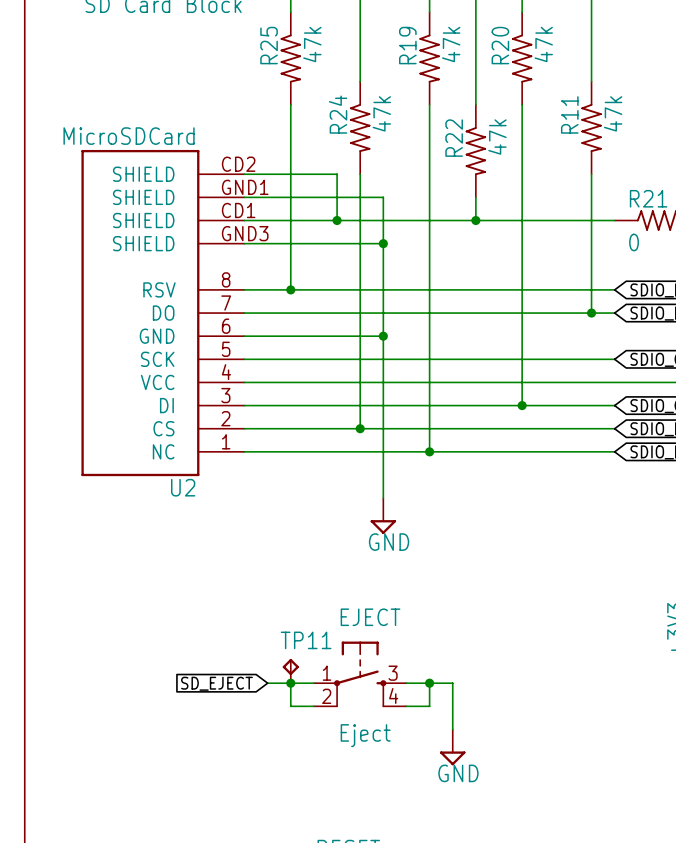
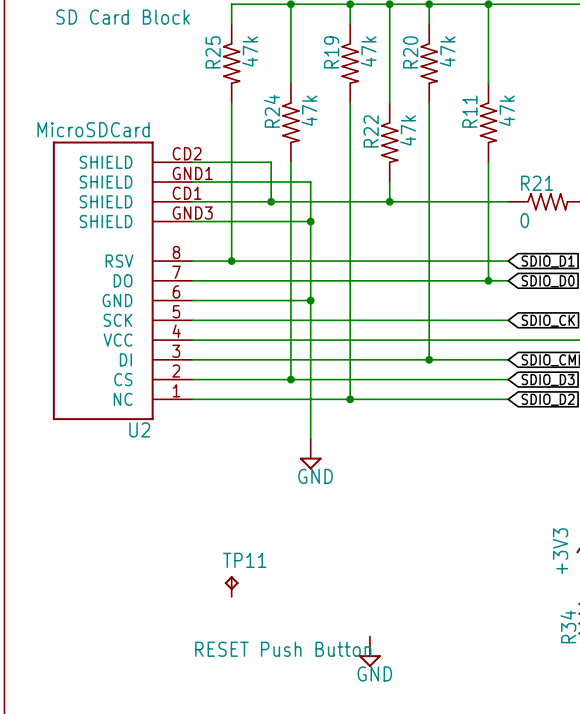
EJECT: Eject (360, 674) -> none
global label: SD_EJECT (216, 683) -> none
wire: (267, 683) (313, 683) -> none
wire: (290, 683) (290, 706) (313, 706) -> none
junction: (290, 683) -> none
wire: (406, 683) (452, 683) (452, 729) -> none
wire: (429, 683) (429, 706) (406, 706) -> none
junction: (429, 683) -> none
text: none -> RESET Push Button (283, 649)

